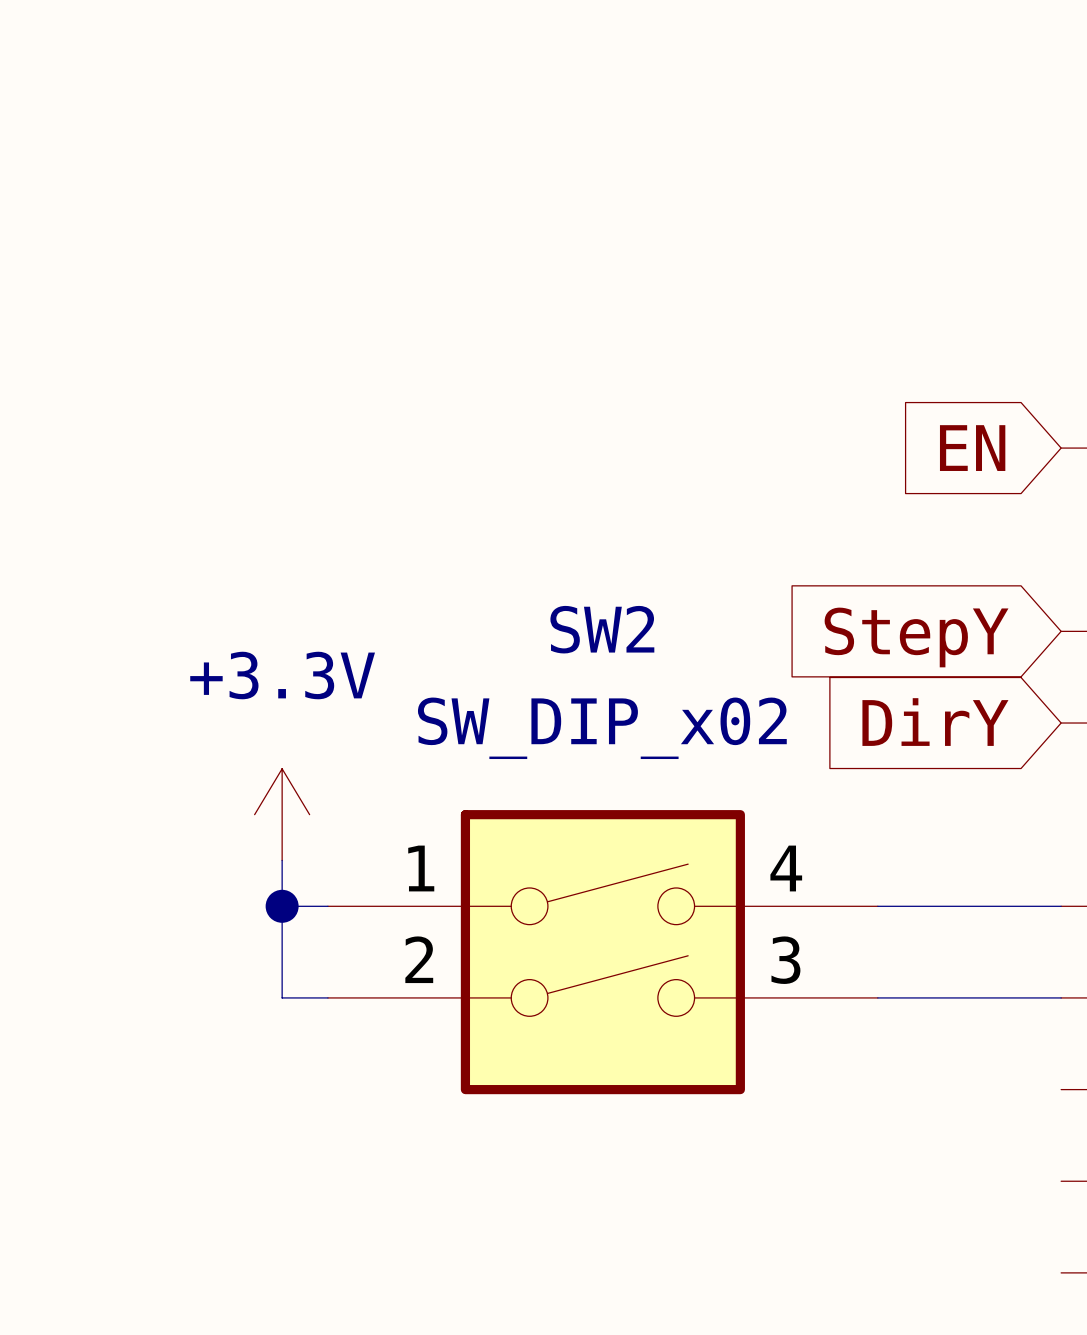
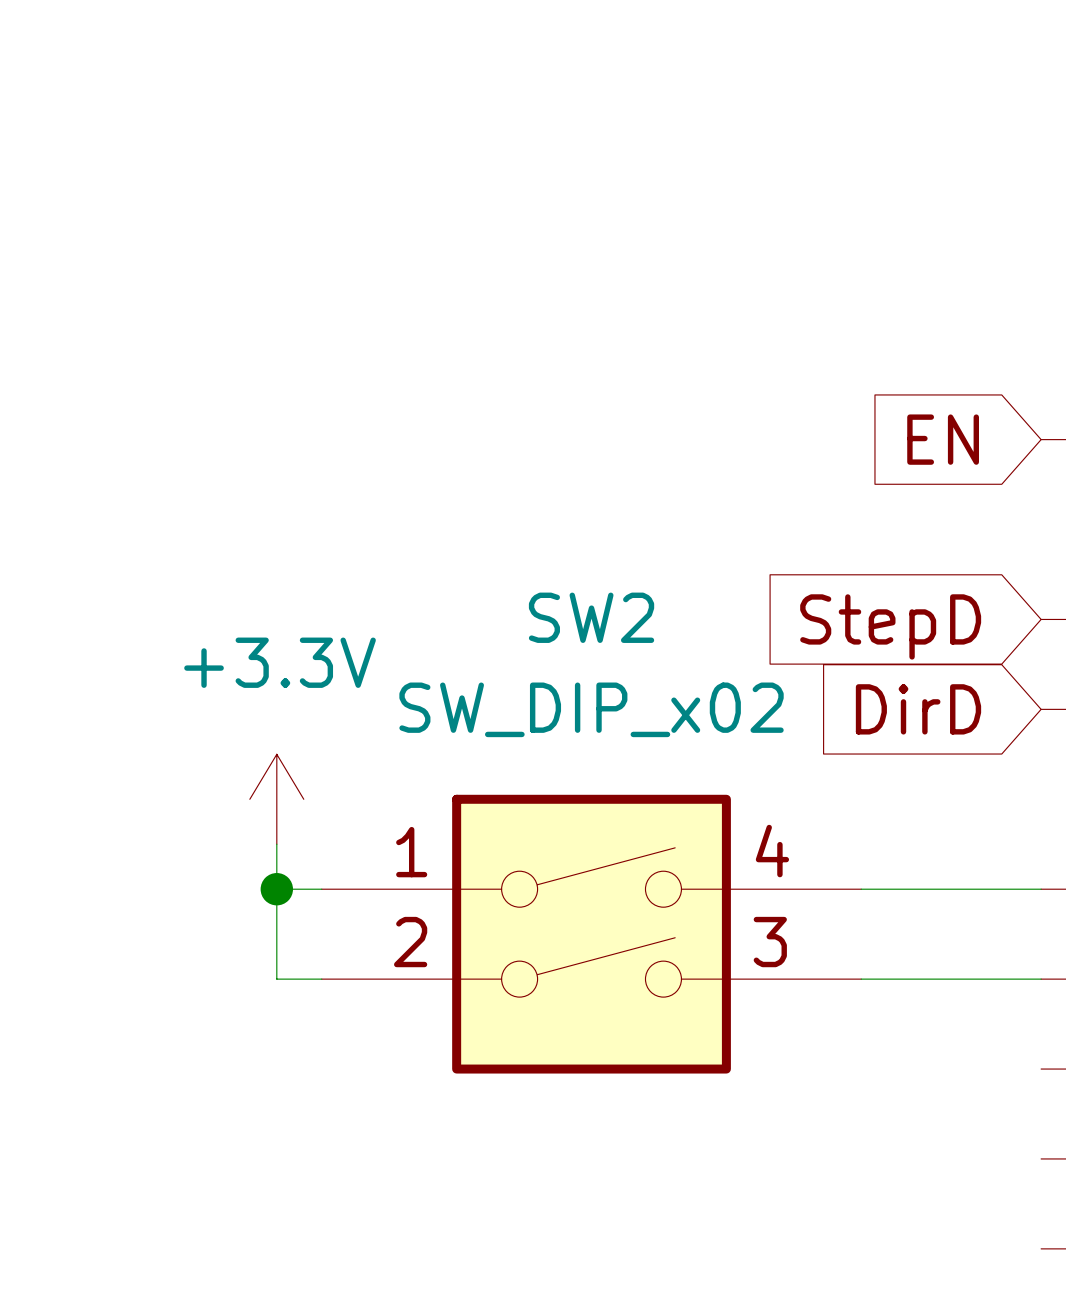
global label: StepY (916, 637) -> StepD (890, 626)
global label: DirY (935, 722) -> DirD (918, 709)

